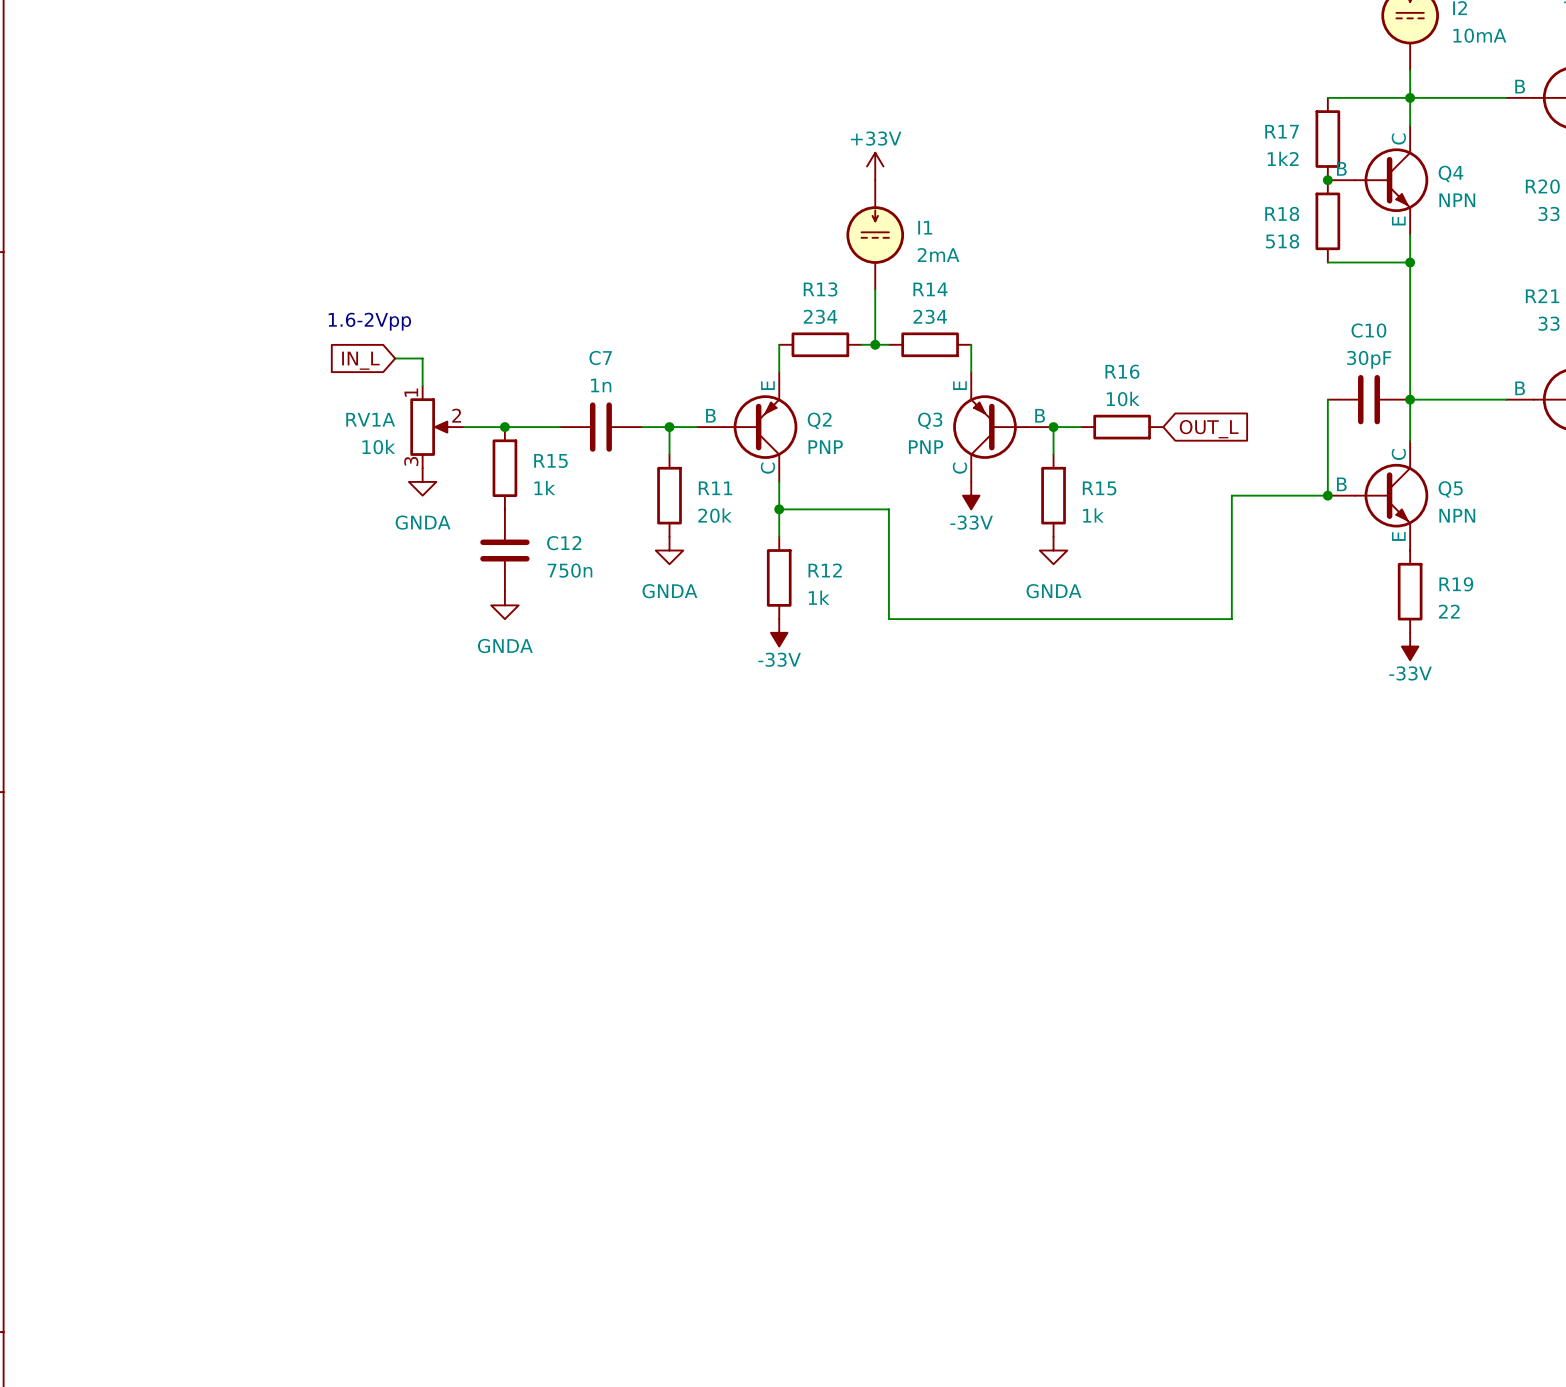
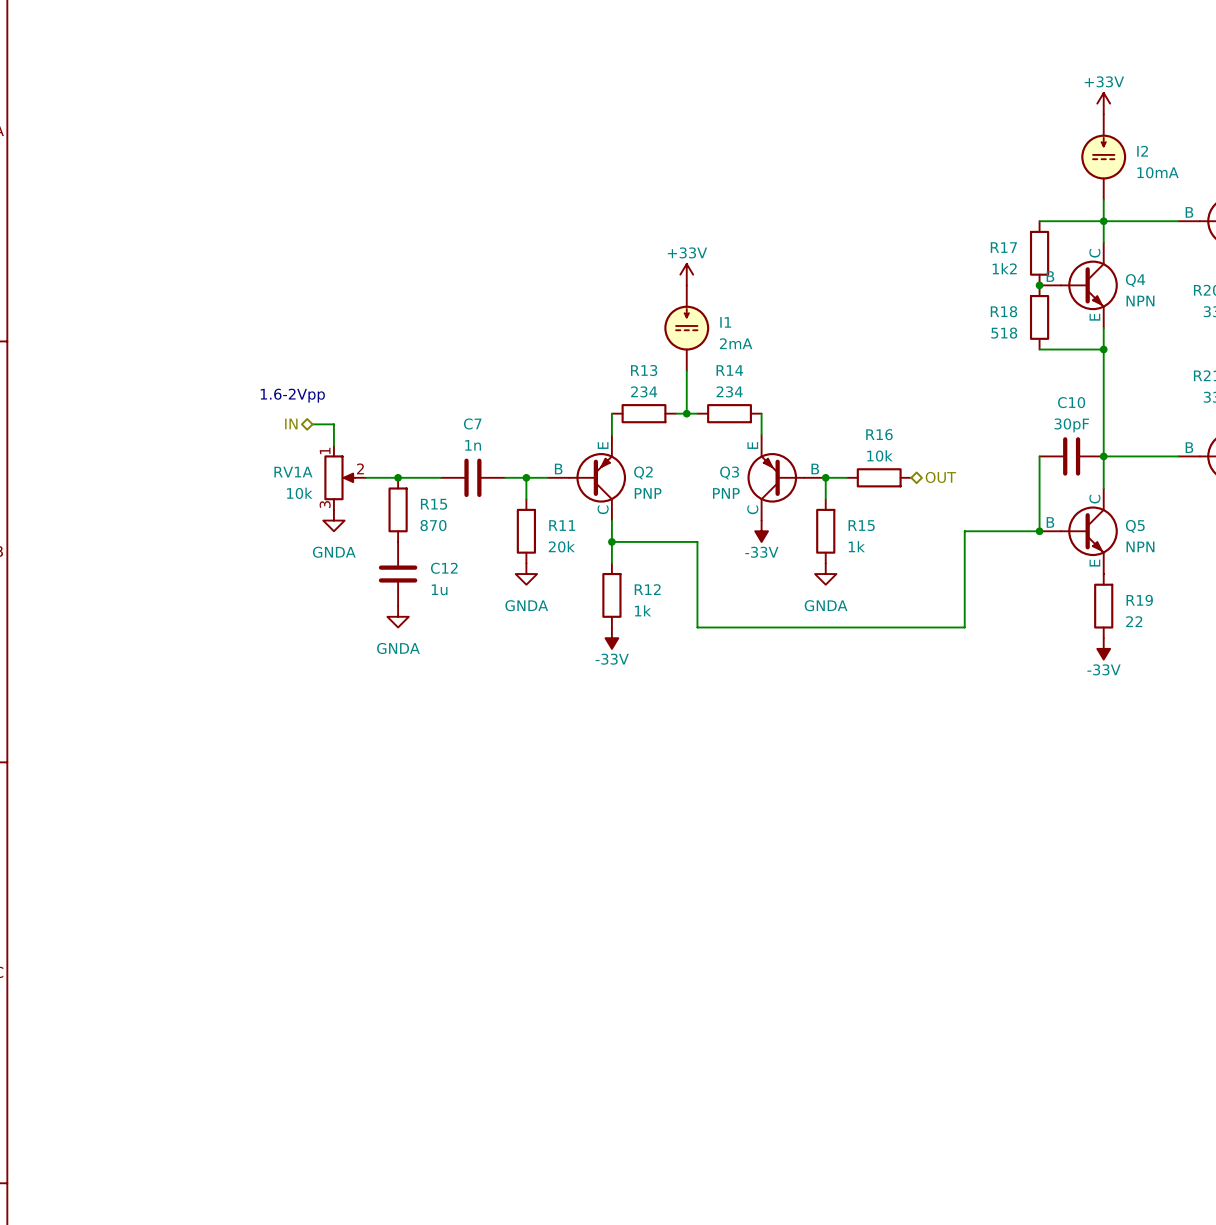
hierarchical label: none -> IN (291, 423)
global label: IN_L (360, 360) -> none
hierarchical label: none -> OUT (940, 477)
global label: OUT_L (1209, 429) -> none
R15 value: 1k (544, 488) -> 870 (433, 525)
C12 value: 750n (569, 570) -> 1u (439, 589)

